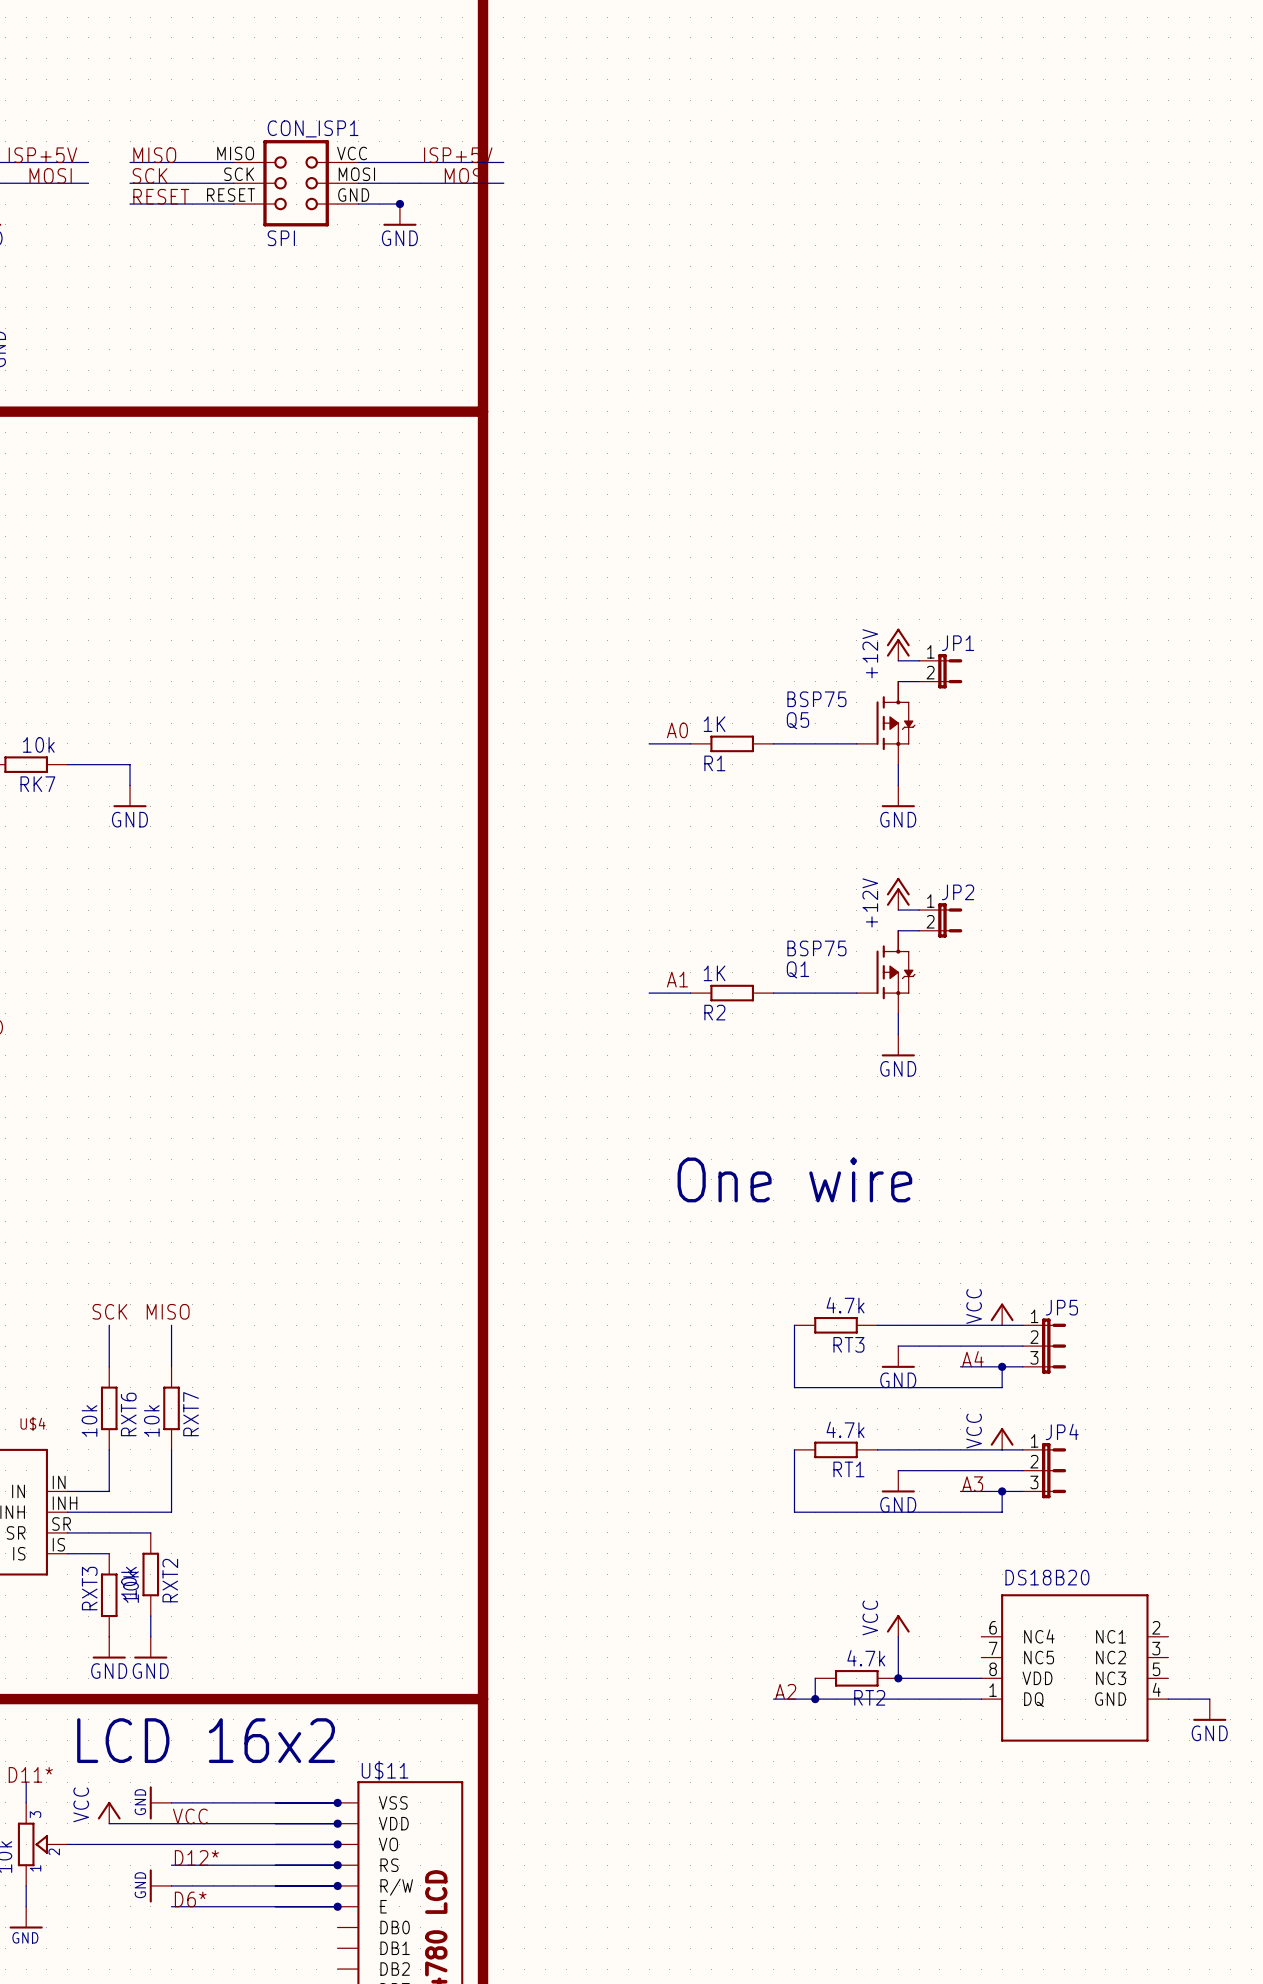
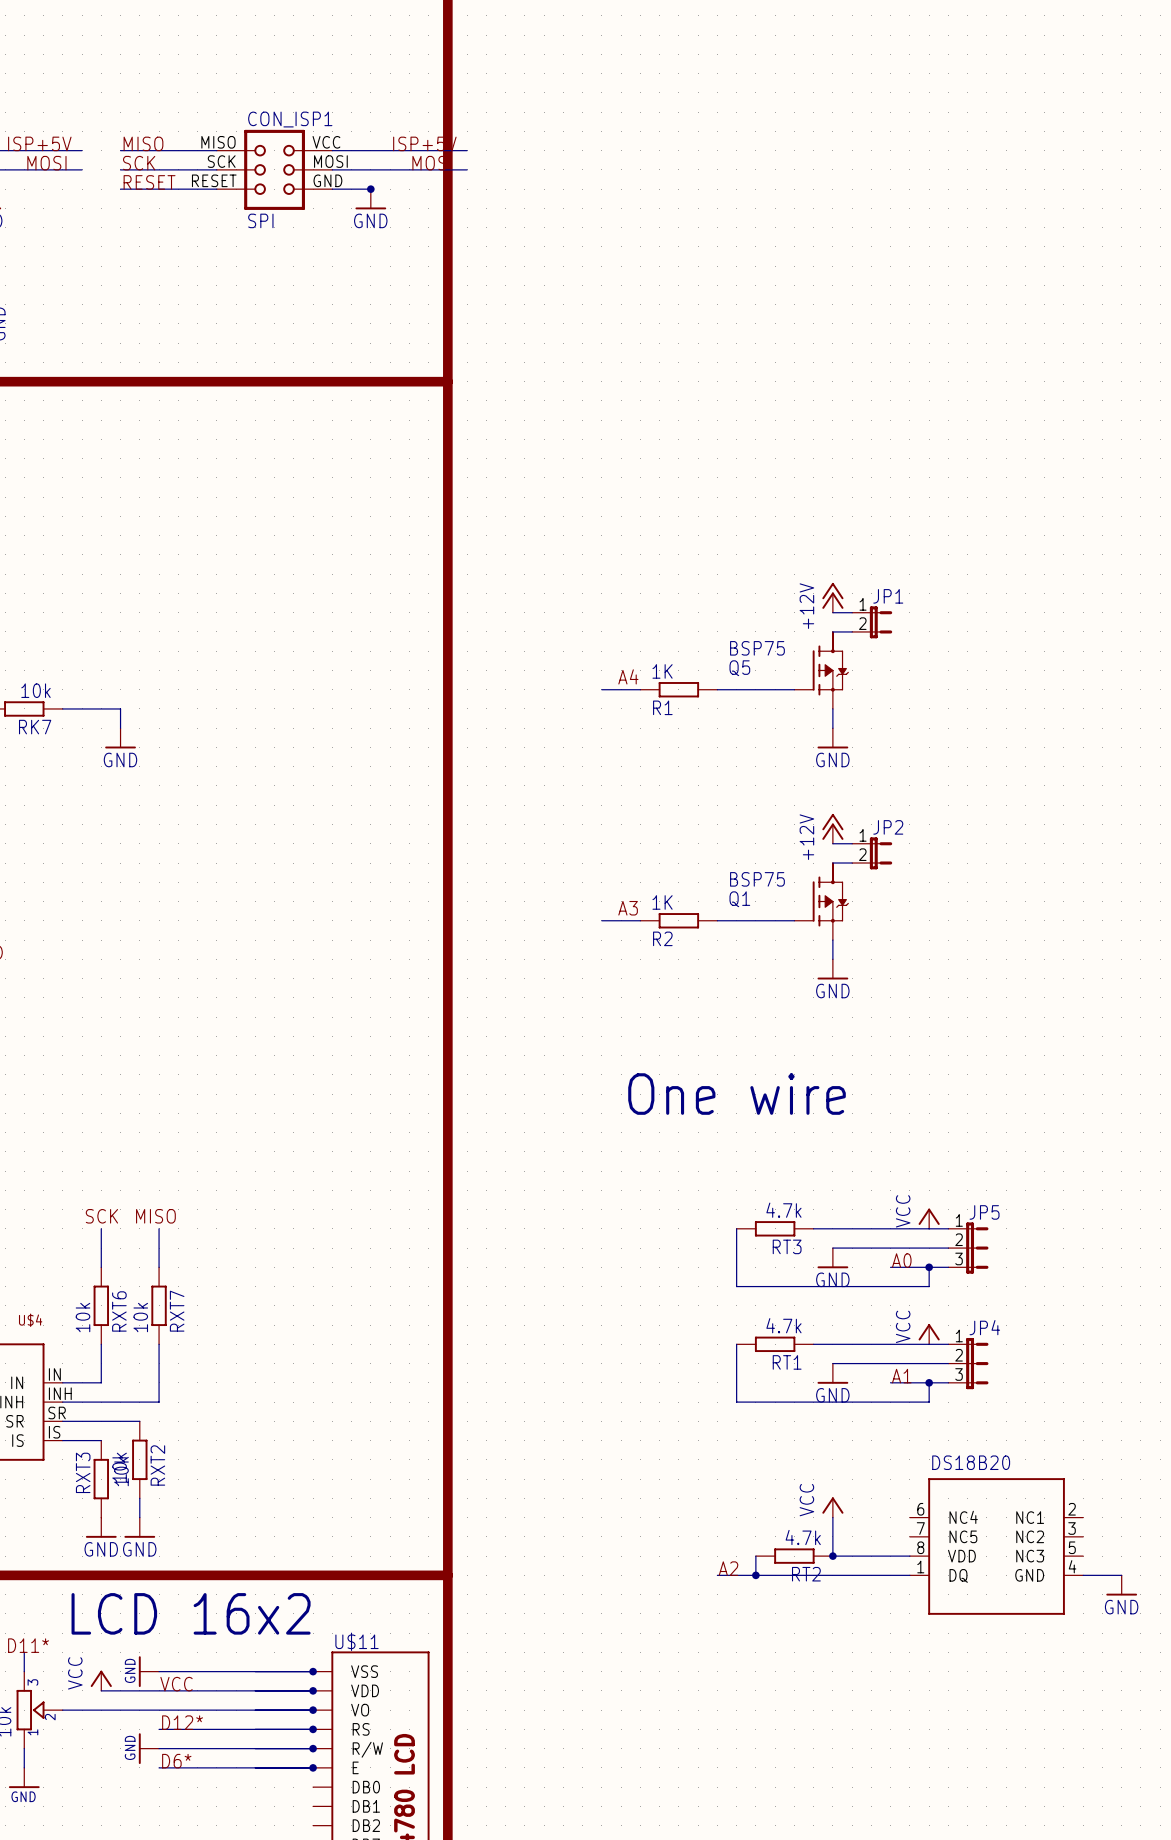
label: A0 (677, 730) -> A4 (628, 676)
label: A1 (677, 979) -> A3 (628, 908)
label: A4 (972, 1359) -> A0 (901, 1260)
label: A3 (972, 1484) -> A1 (901, 1376)

